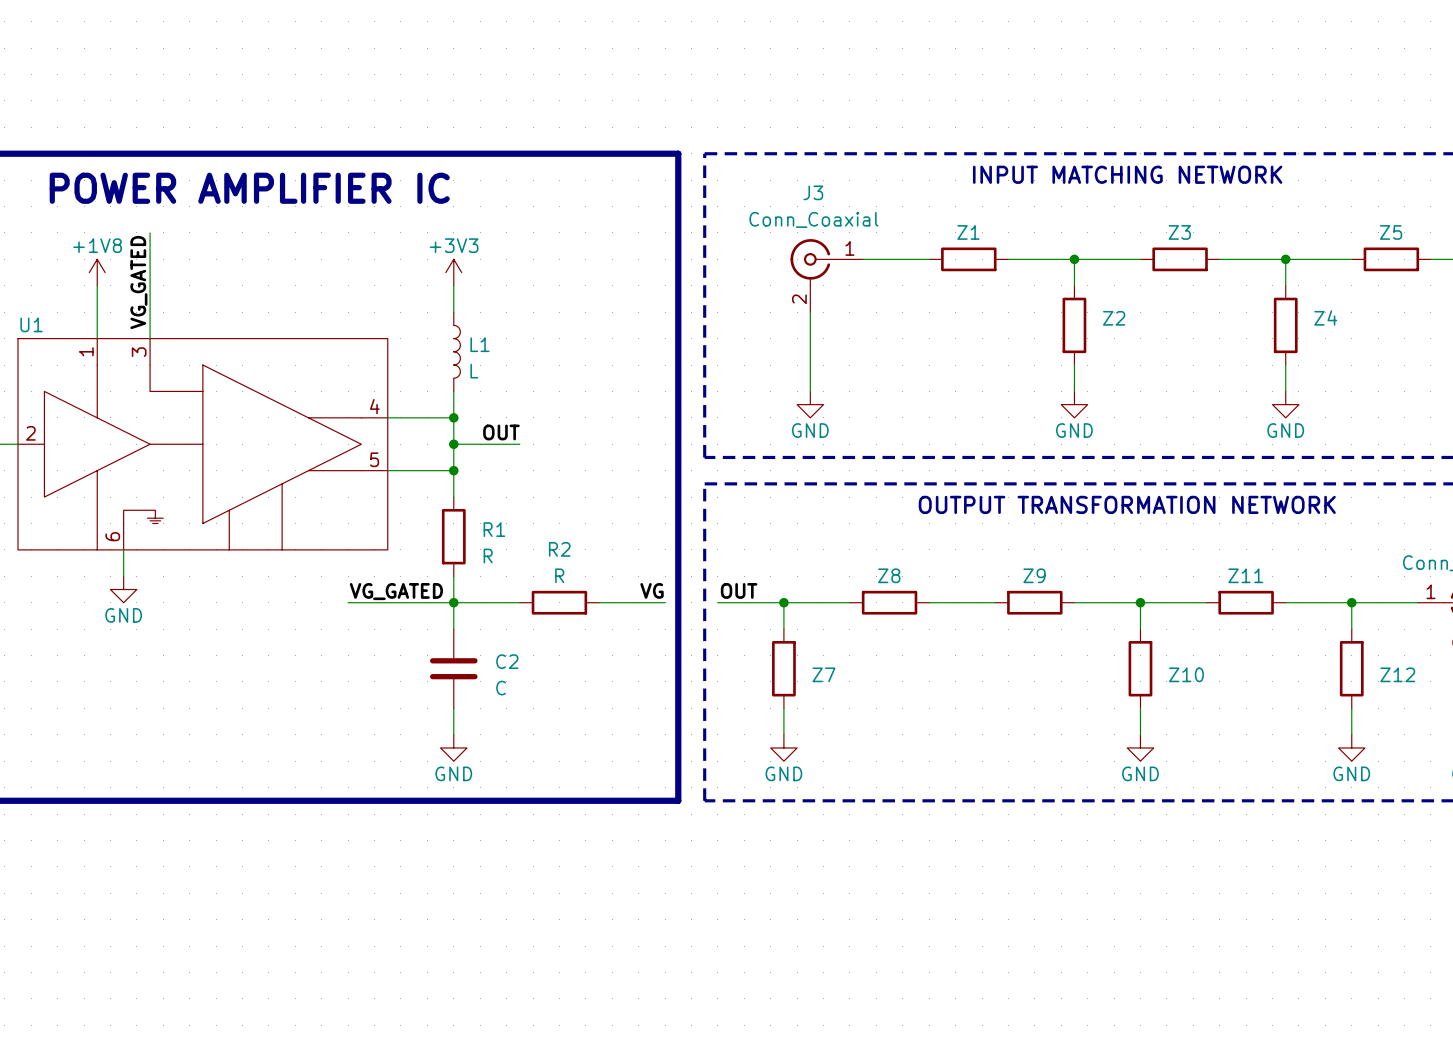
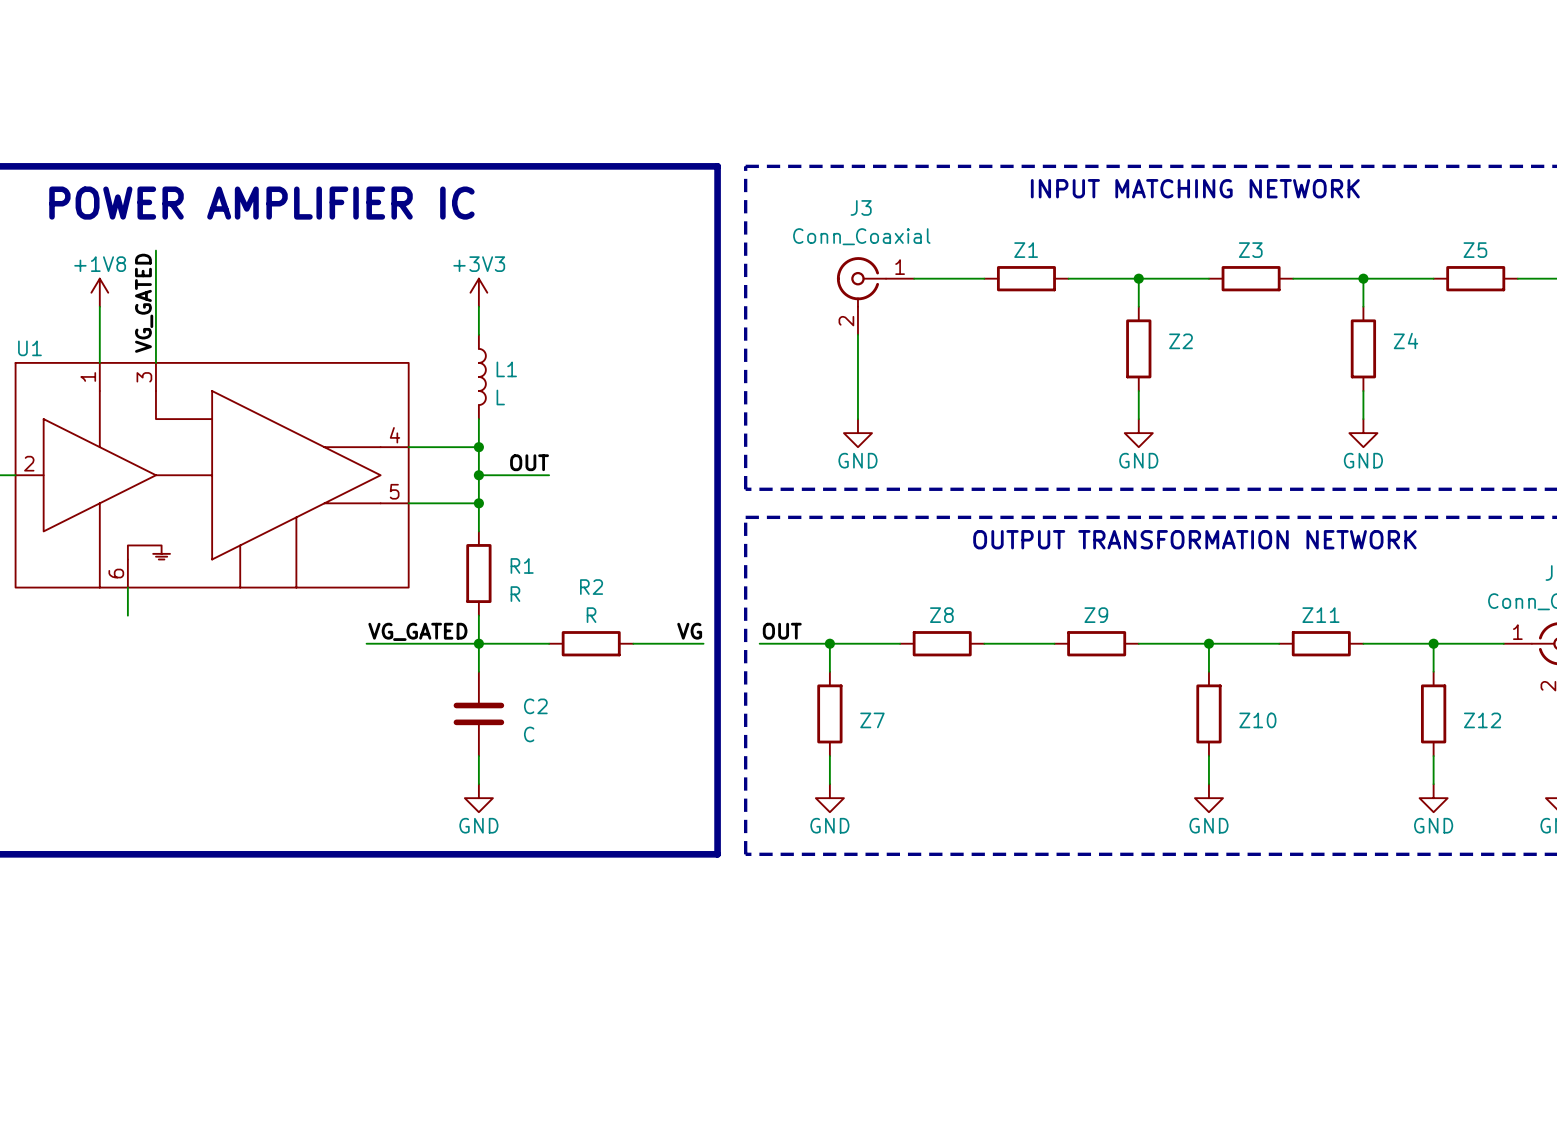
power symbol: GND (123, 589) -> none

